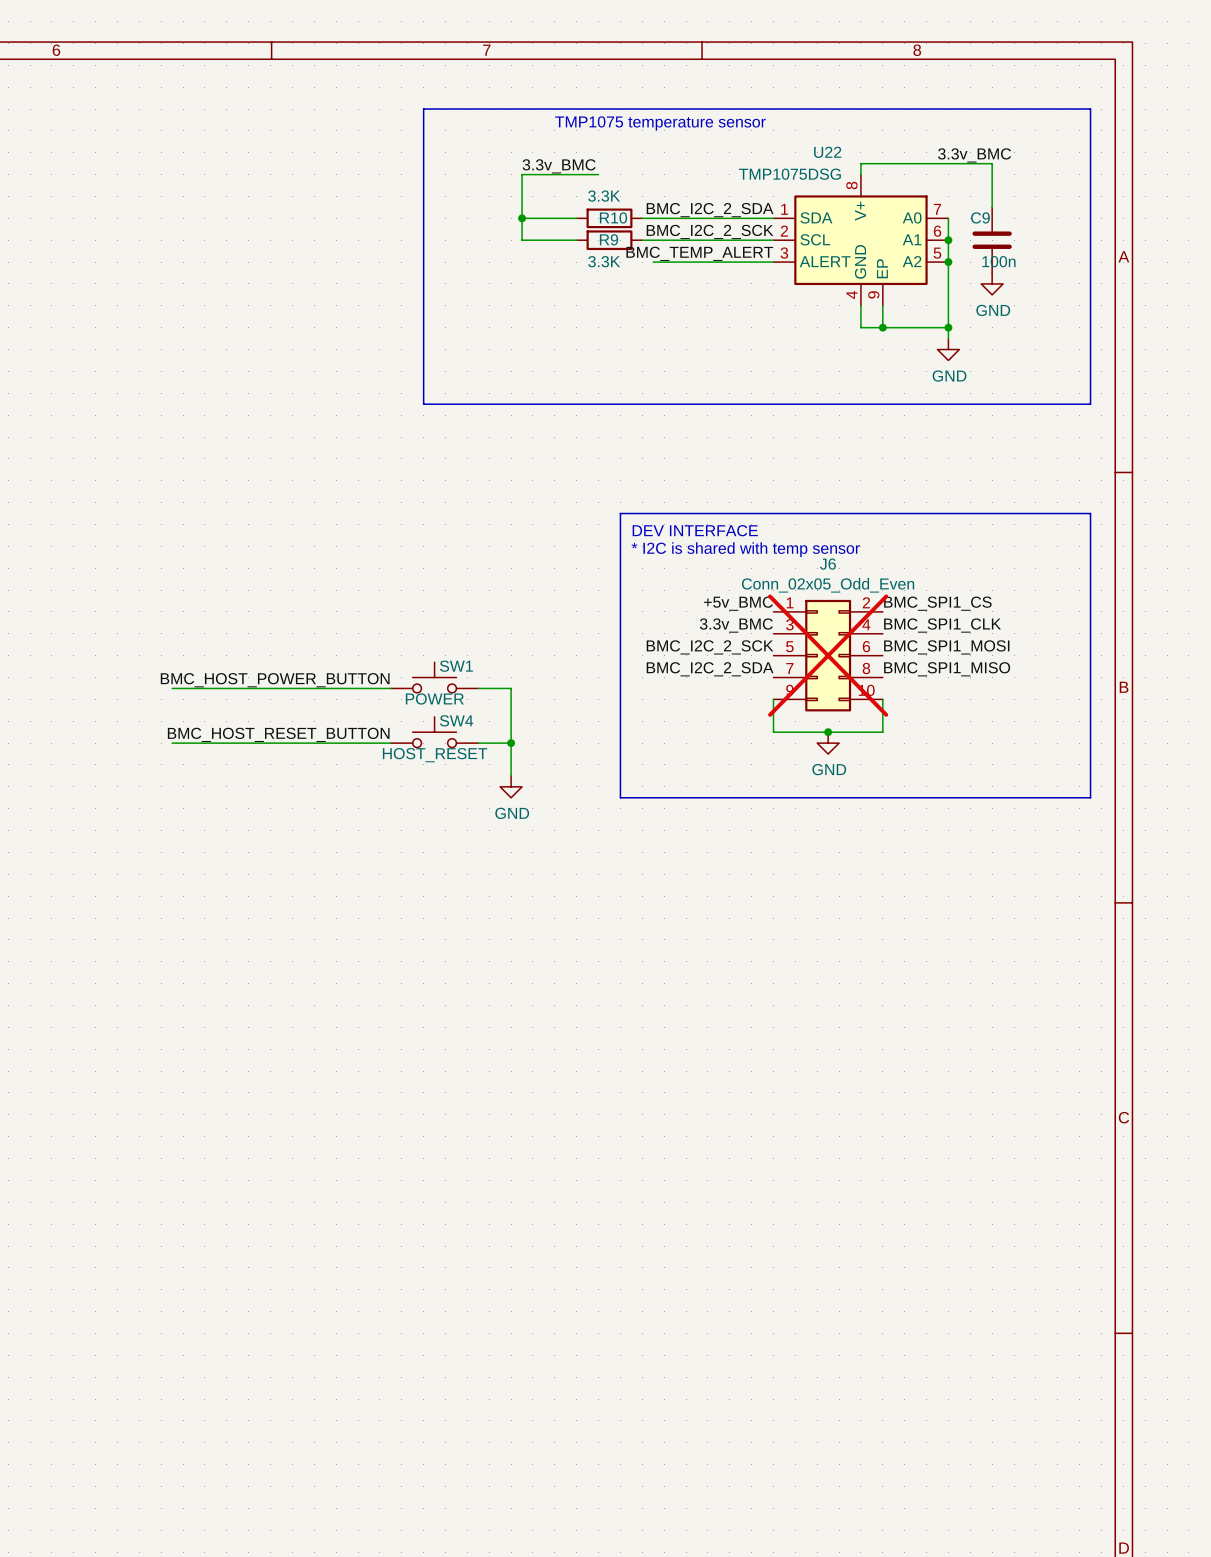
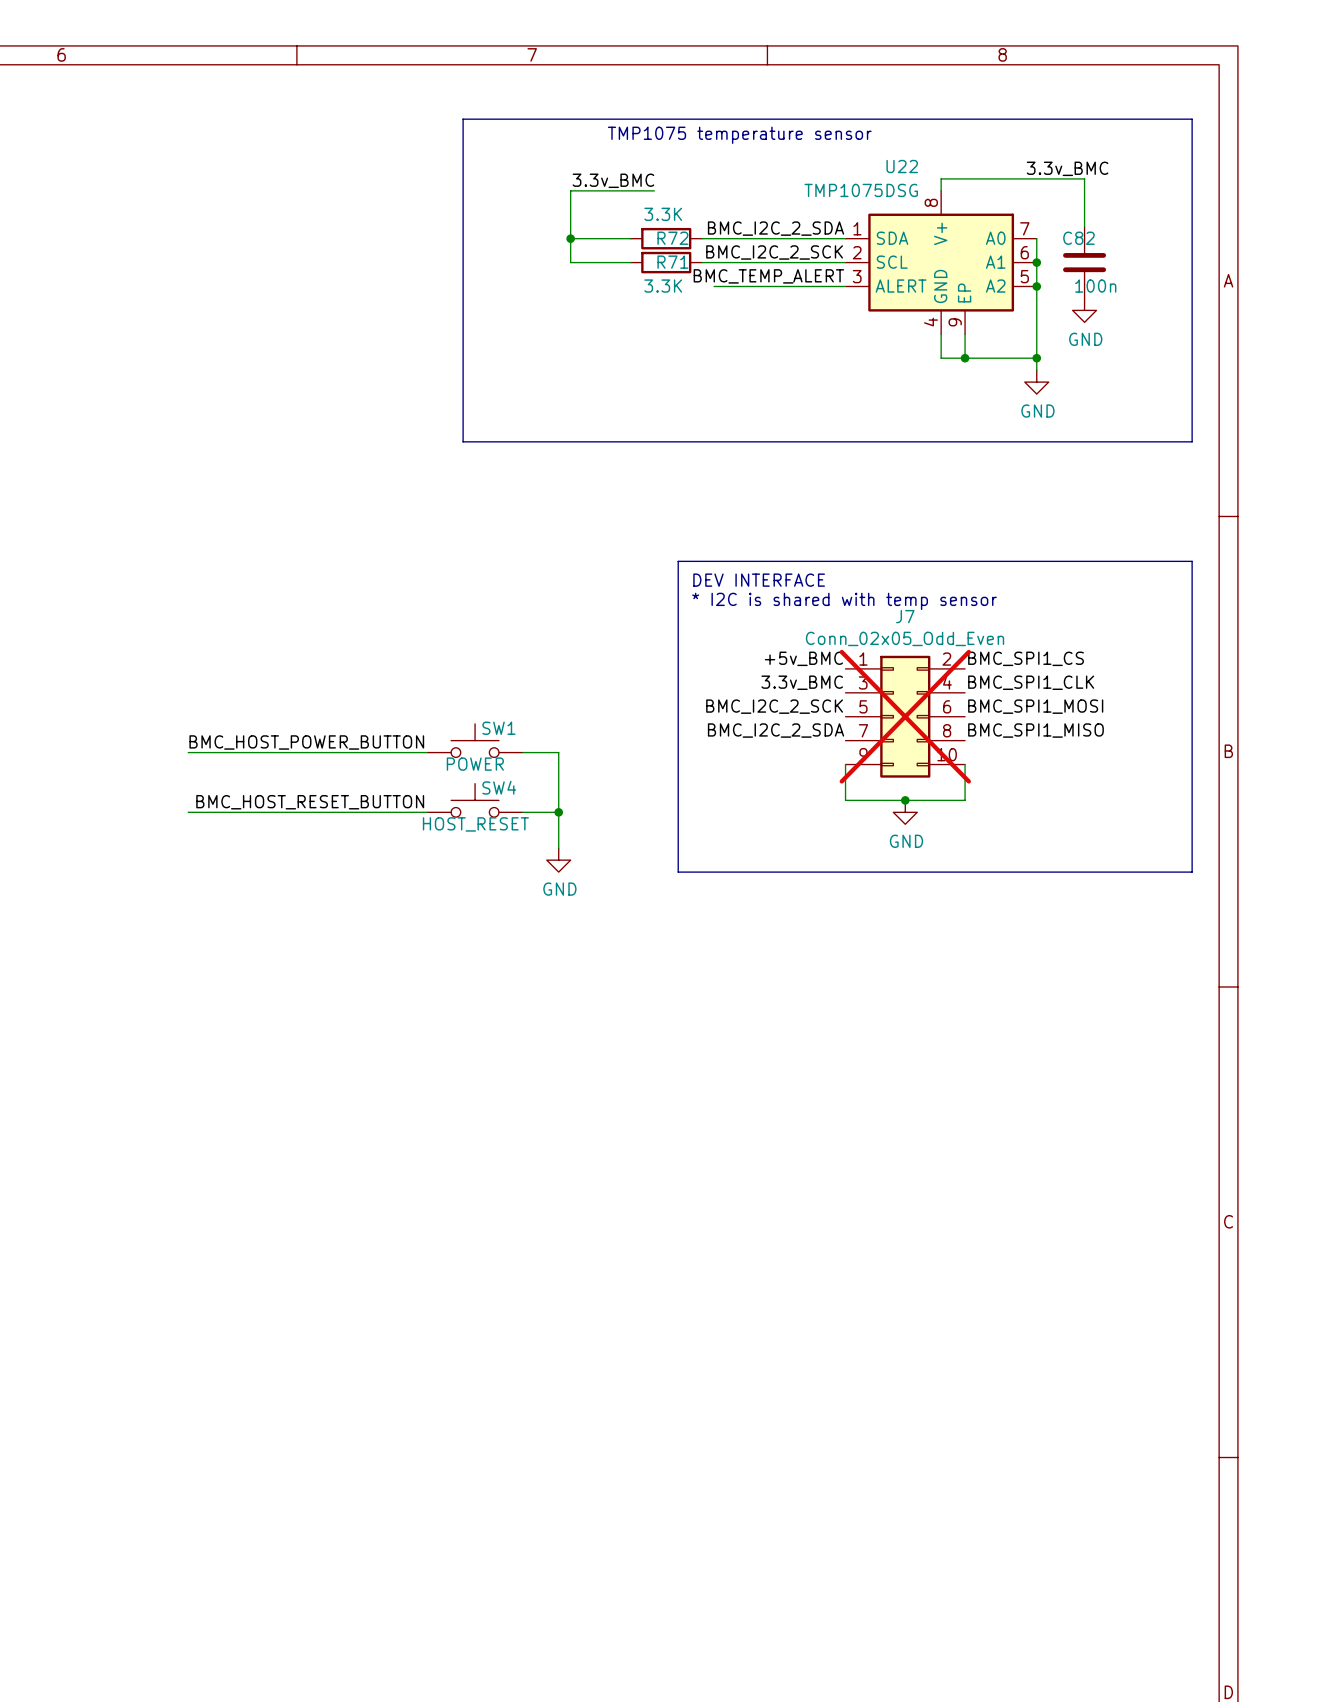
R10 name: R10 (613, 217) -> R72 (672, 238)
C9 name: C9 (980, 217) -> C82 (1078, 238)
R9 name: R9 (609, 239) -> R71 (672, 262)
J6 name: J6 (827, 564) -> J7 (905, 616)

